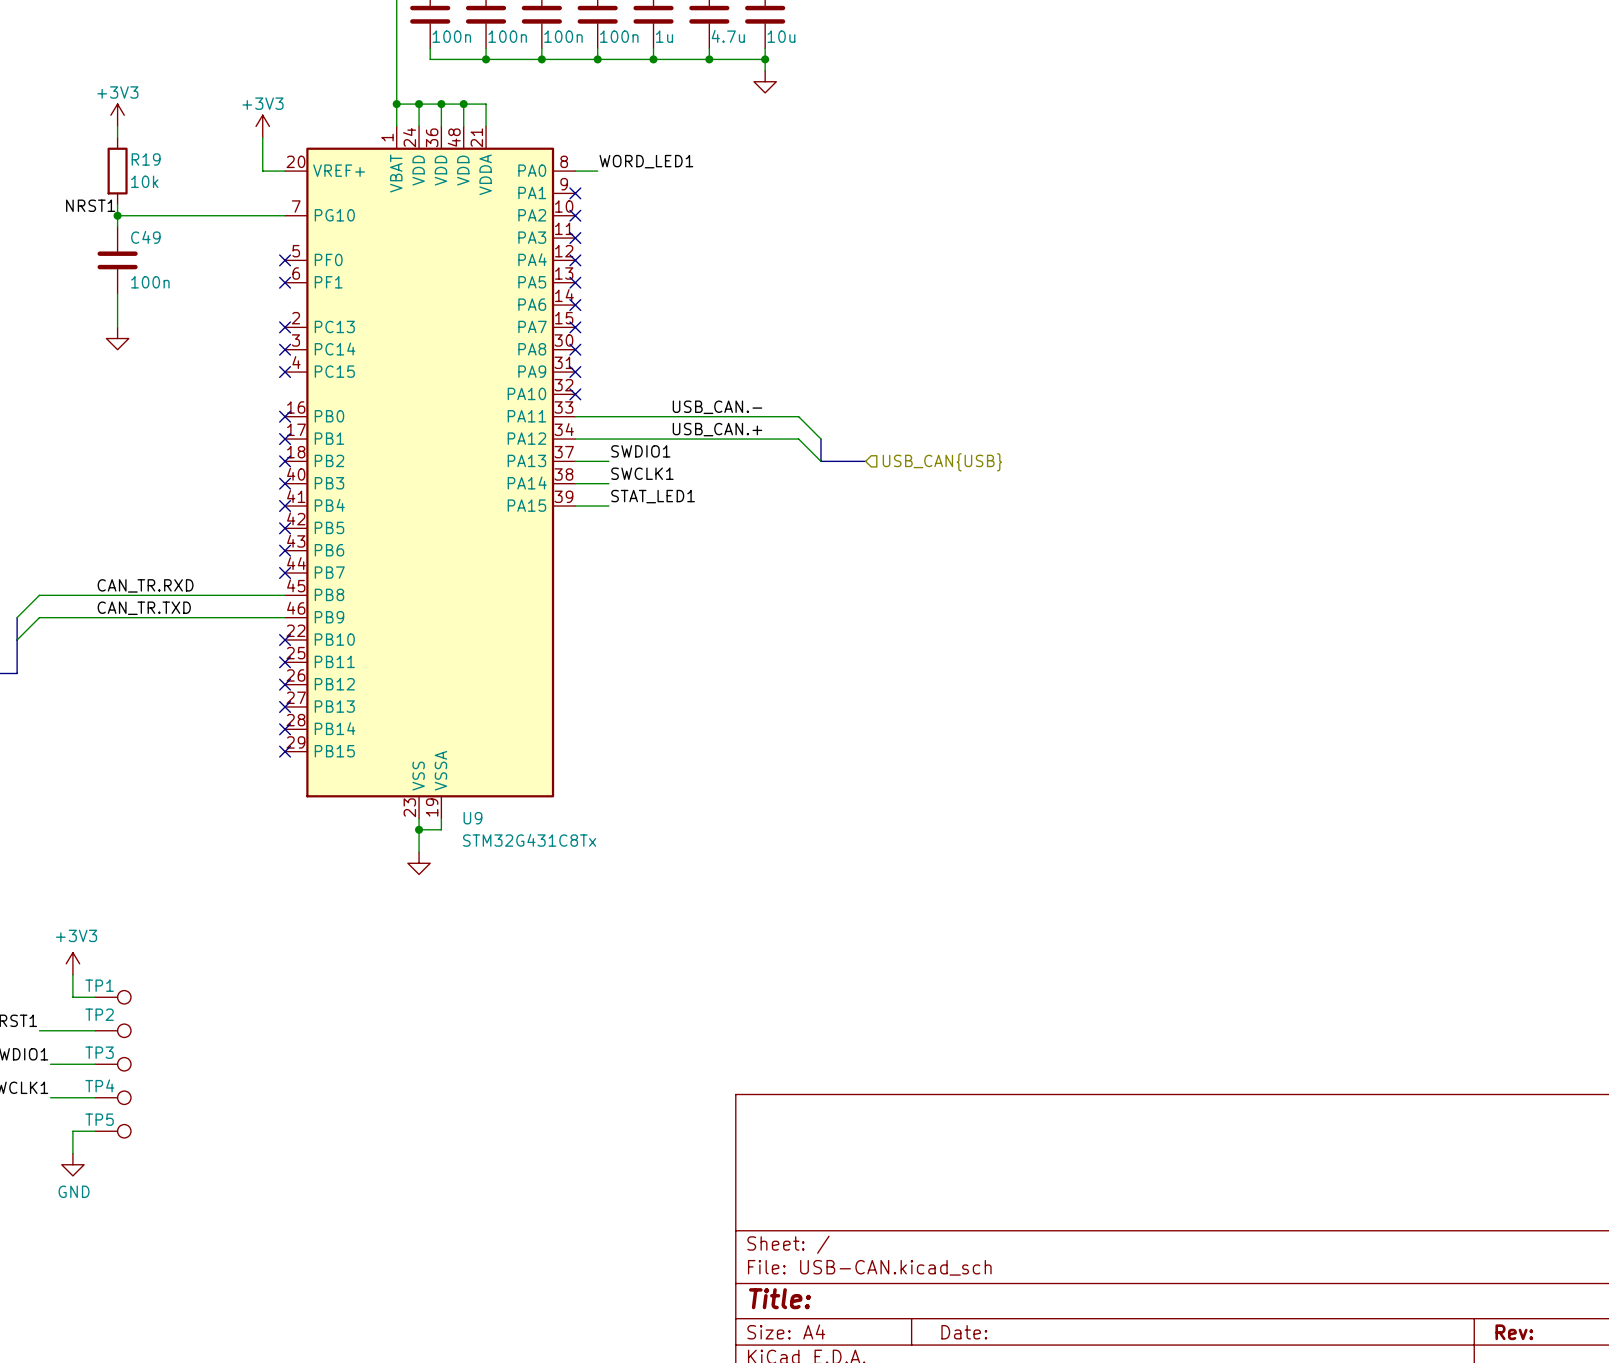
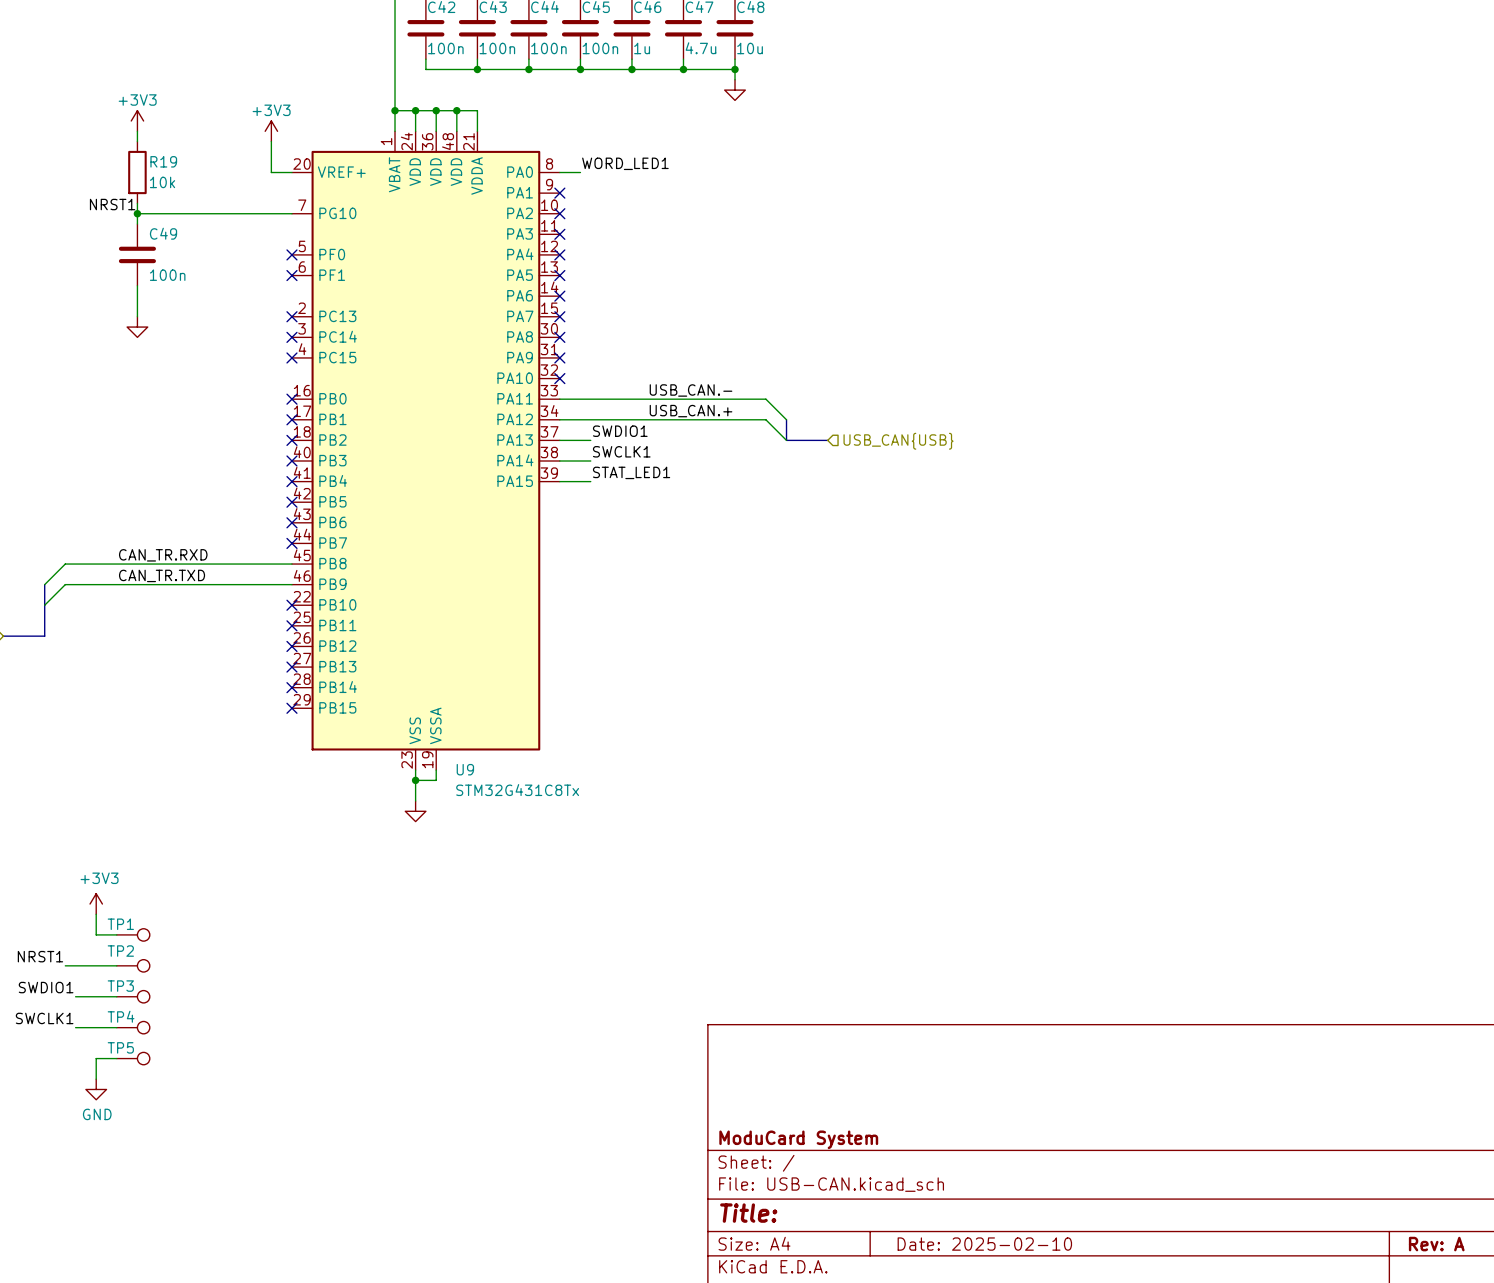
title block: none -> ModuCard System (798, 1139)
title block: Date: (964, 1332) -> Date: 2025-02-10 (984, 1244)
title block: Rev: (1514, 1332) -> Rev: A (1436, 1244)

